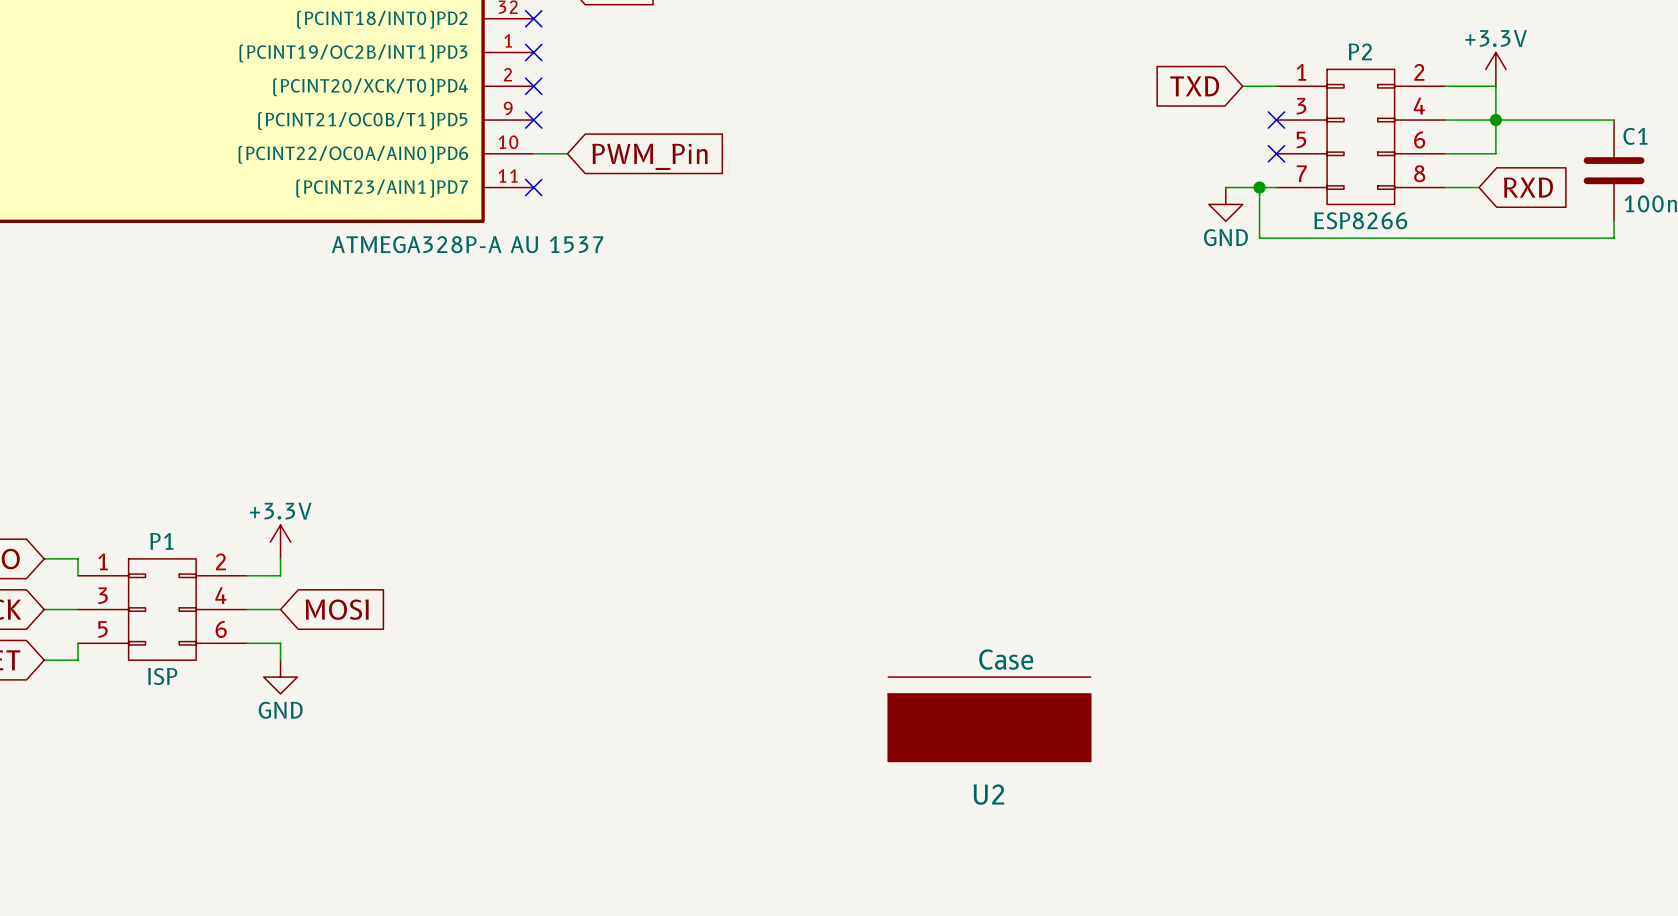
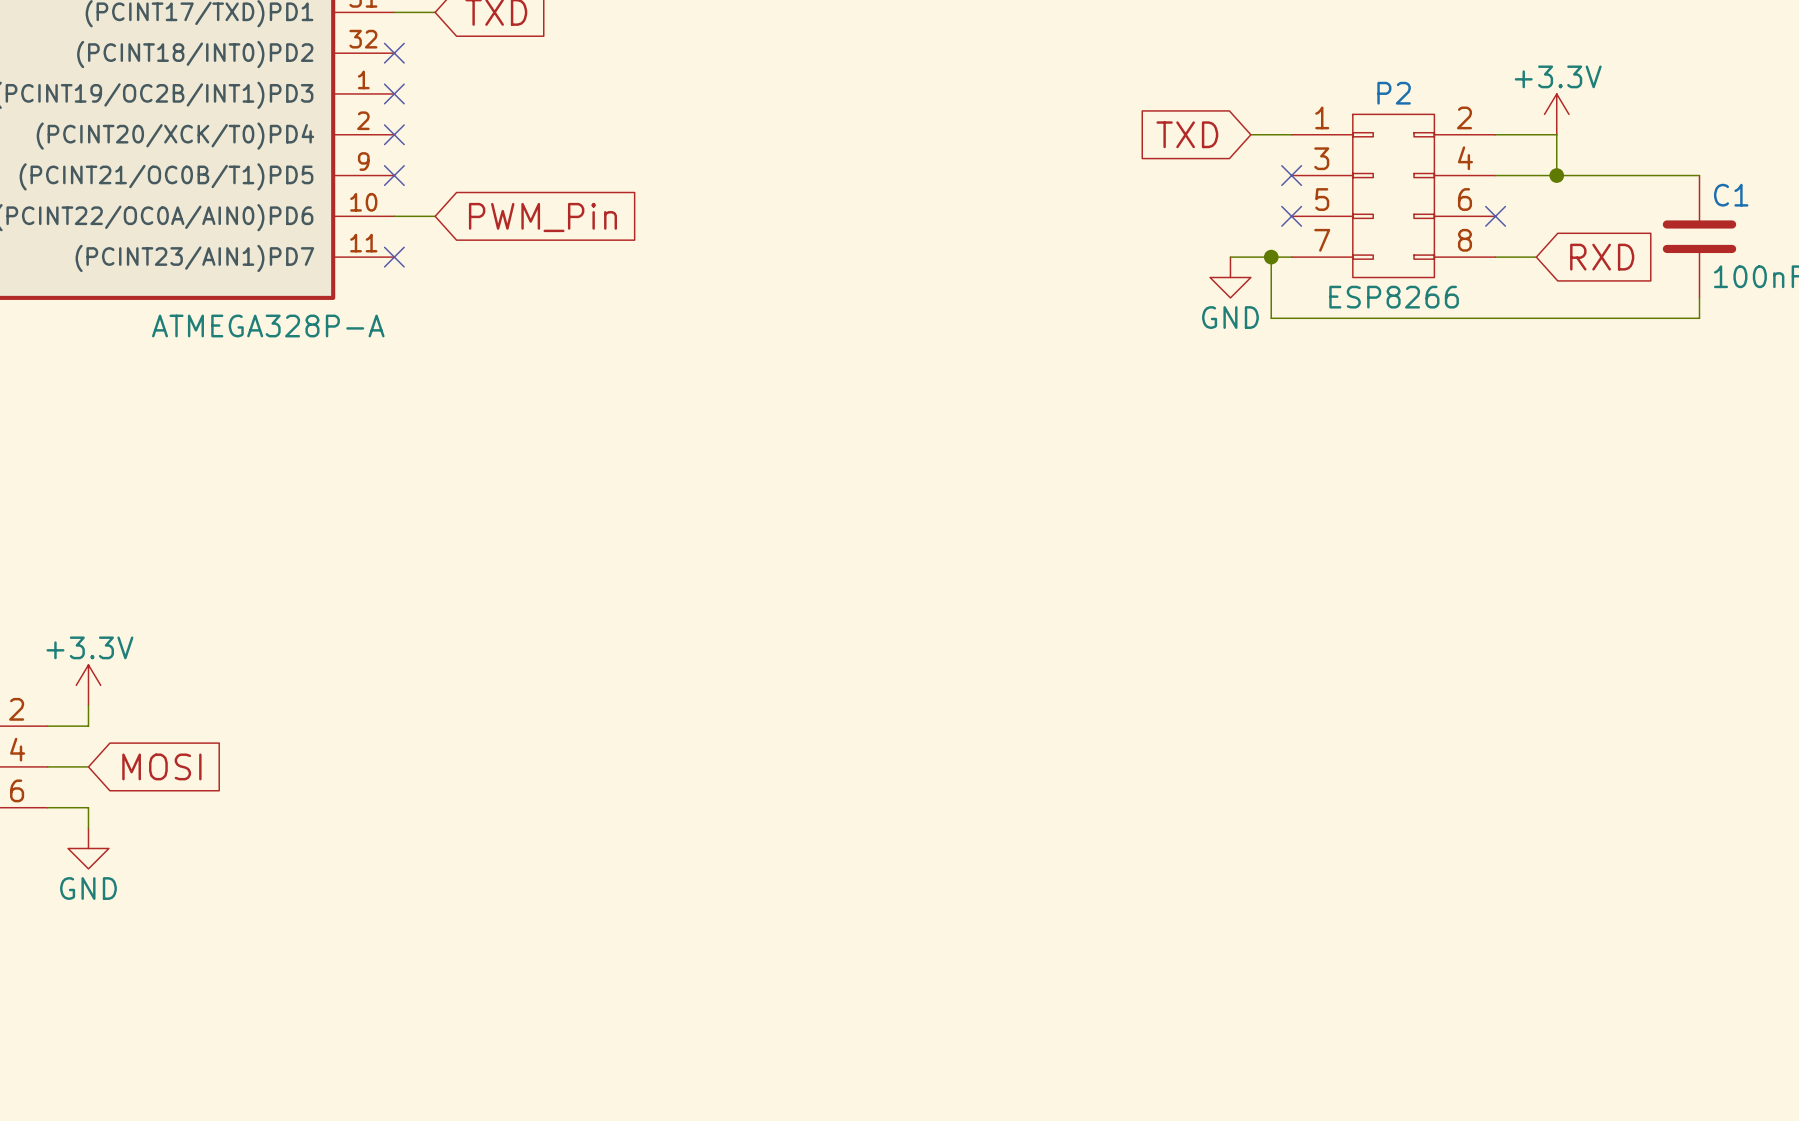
wire: (1495, 120) (1495, 153) (1445, 153) -> none
no-connect mark: none -> (1495, 216)
part value: ATMEGA328P-A AU 1537 (467, 244) -> ATMEGA328P-A (268, 325)
U2: Case (989, 719) -> none

